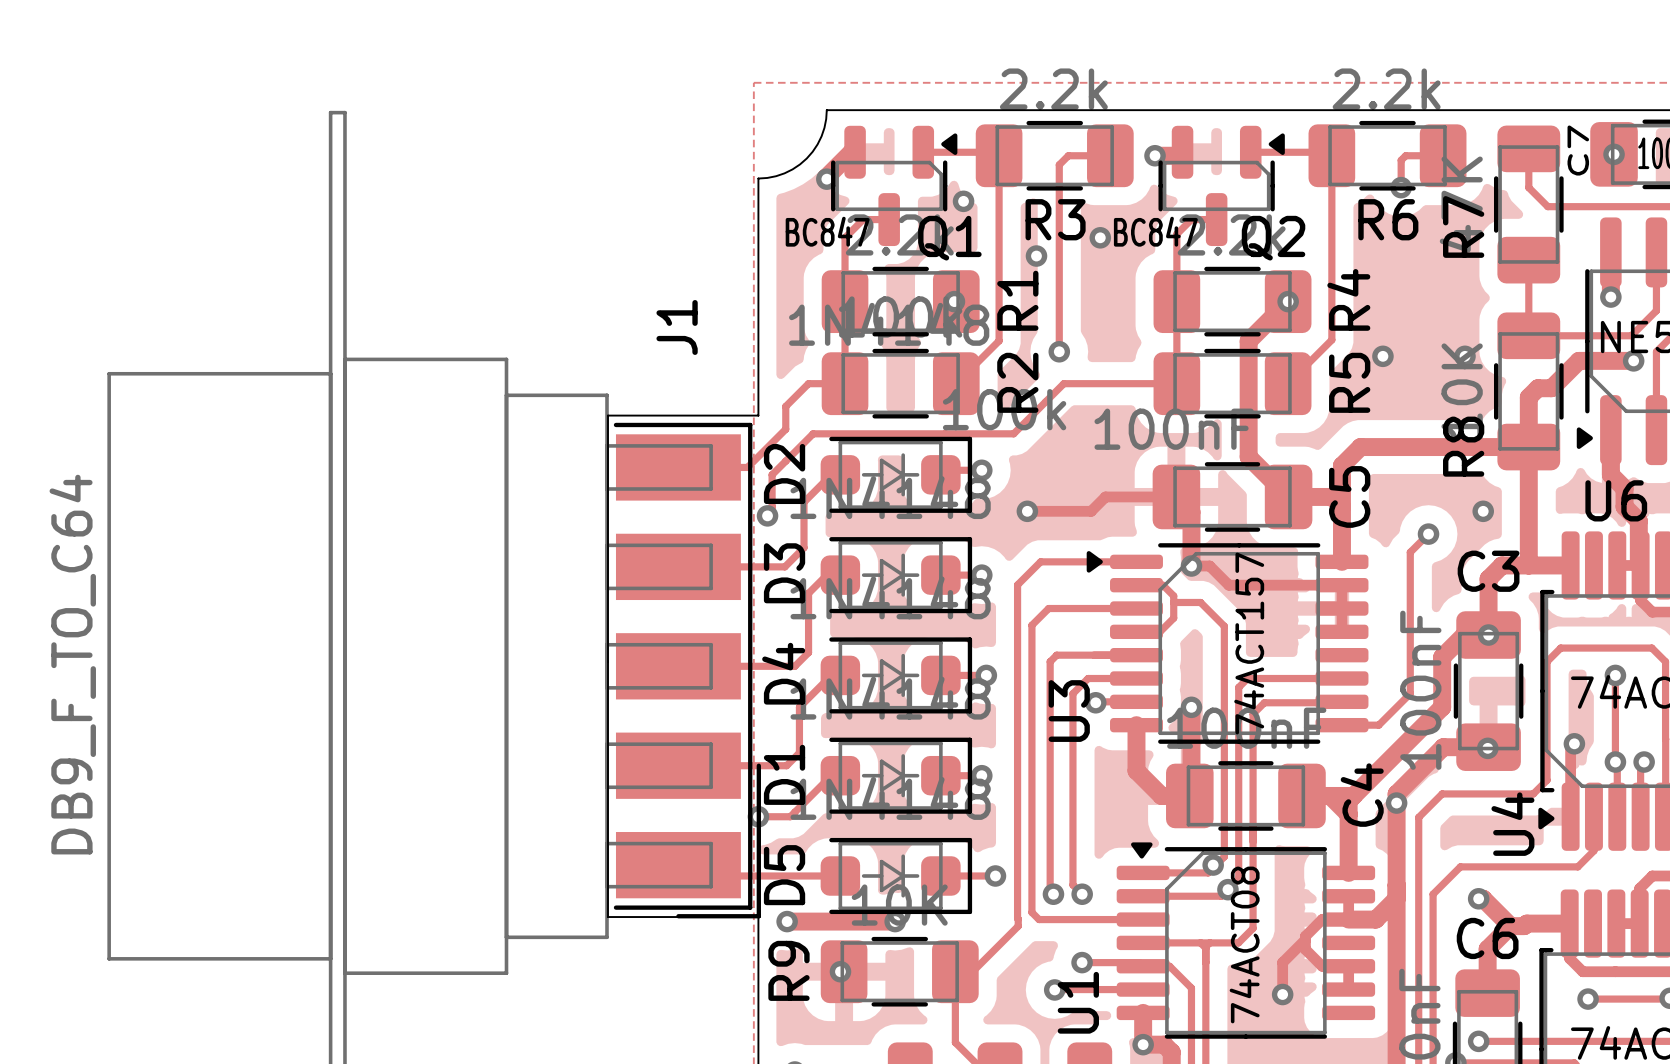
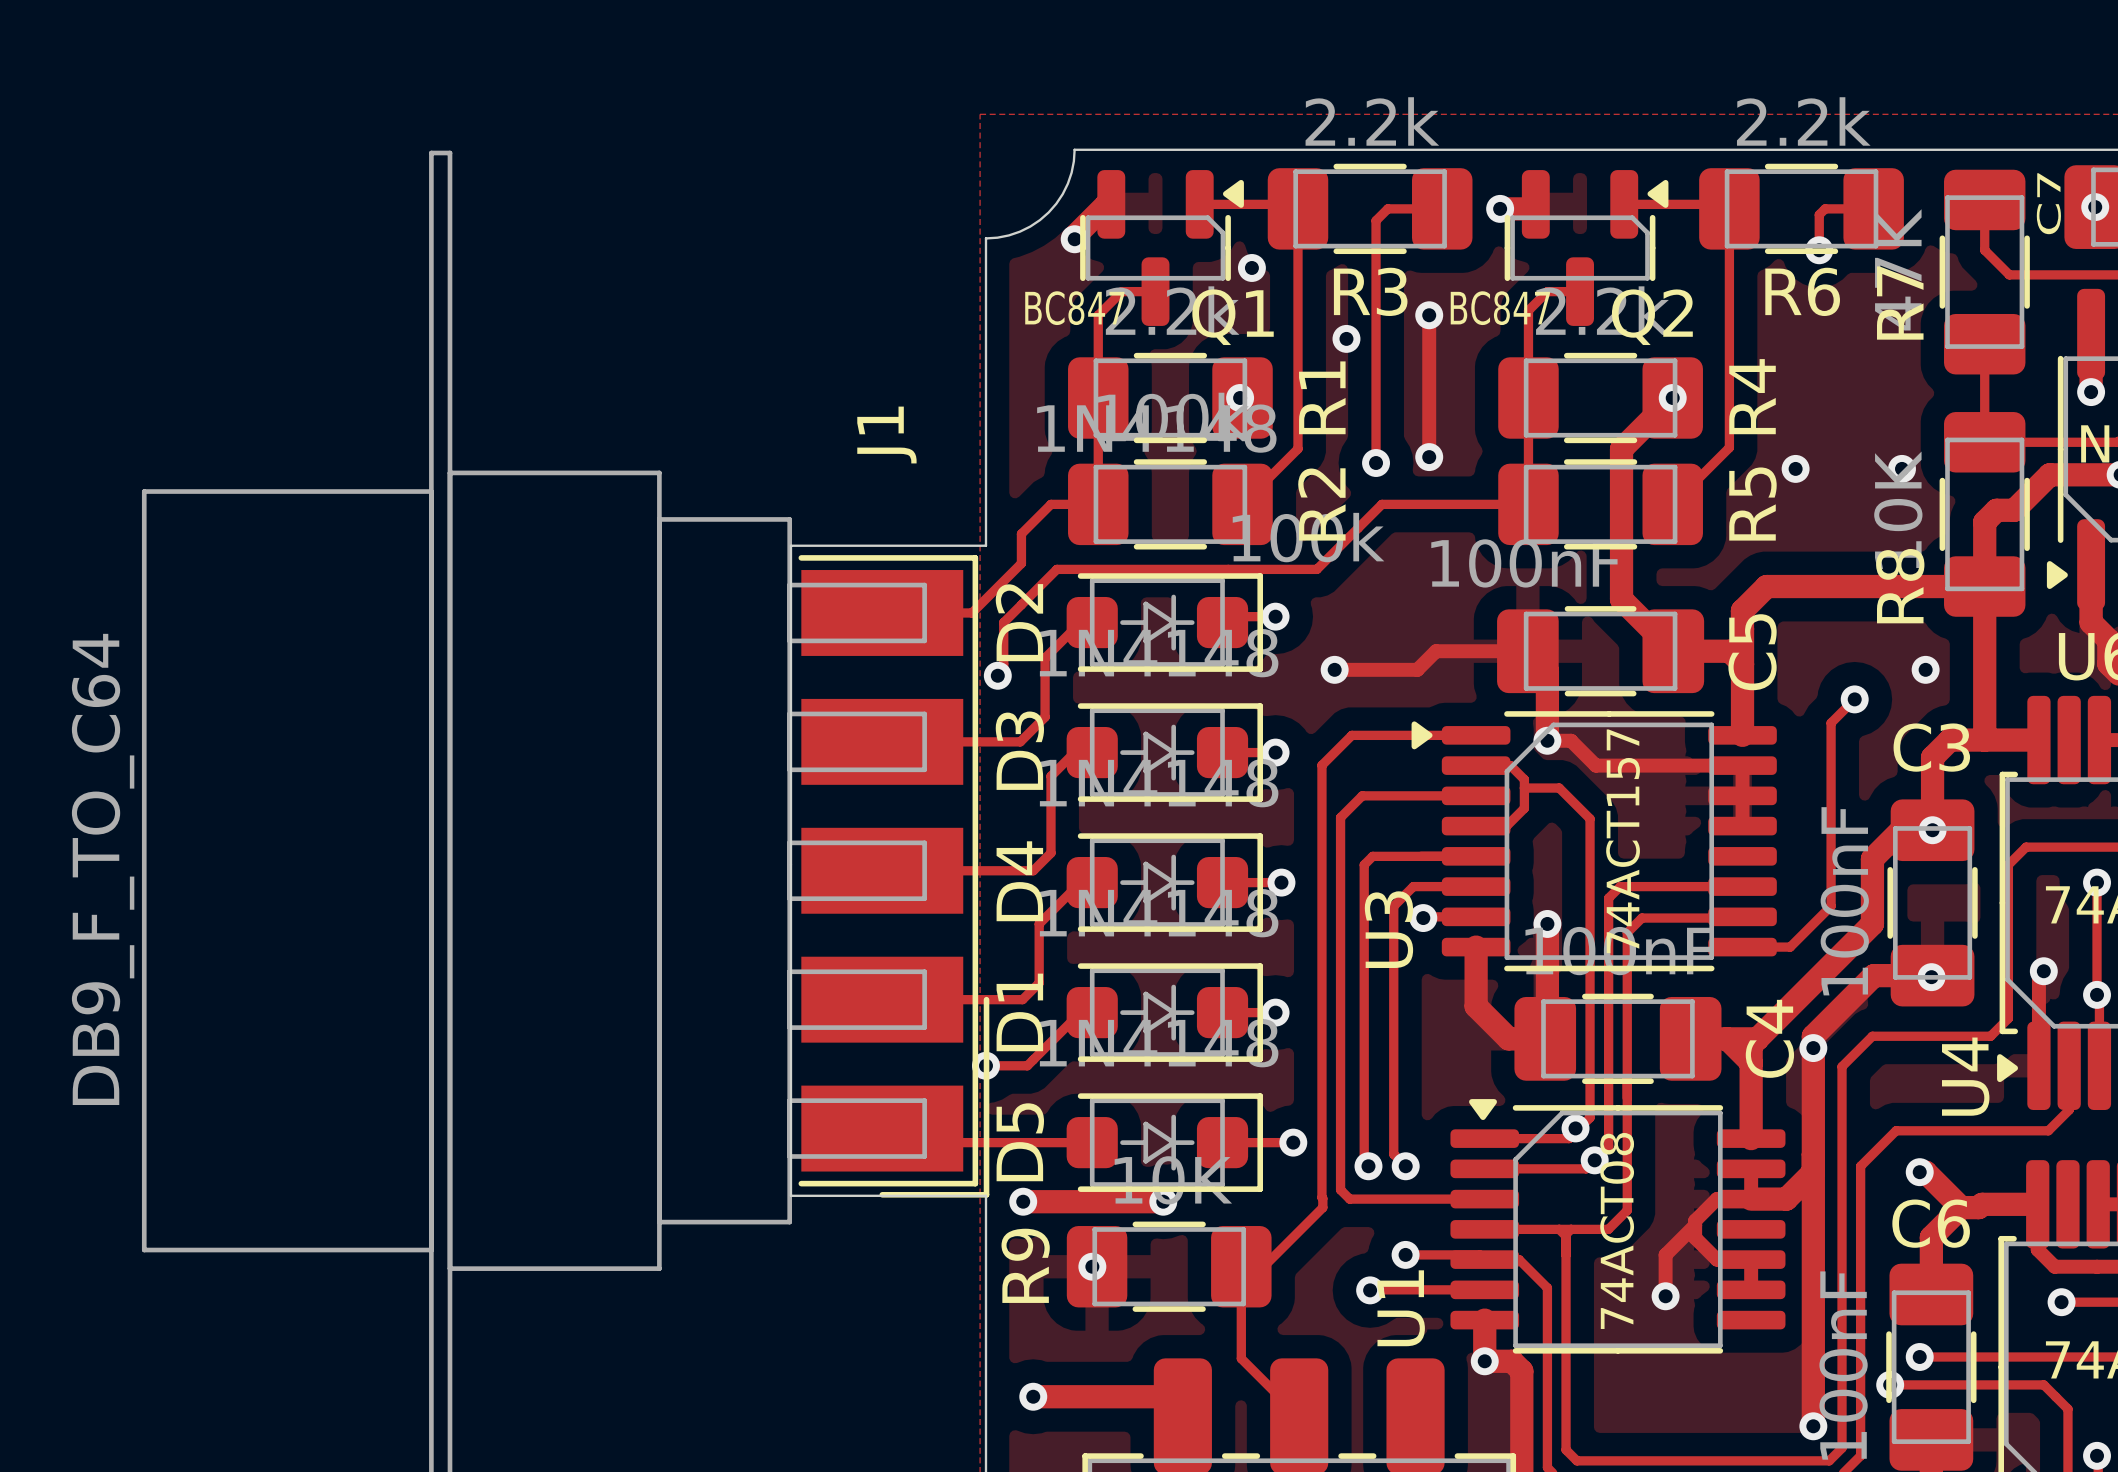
track: none -> (1429, 315) (1429, 457)
via: none -> (1429, 457)

